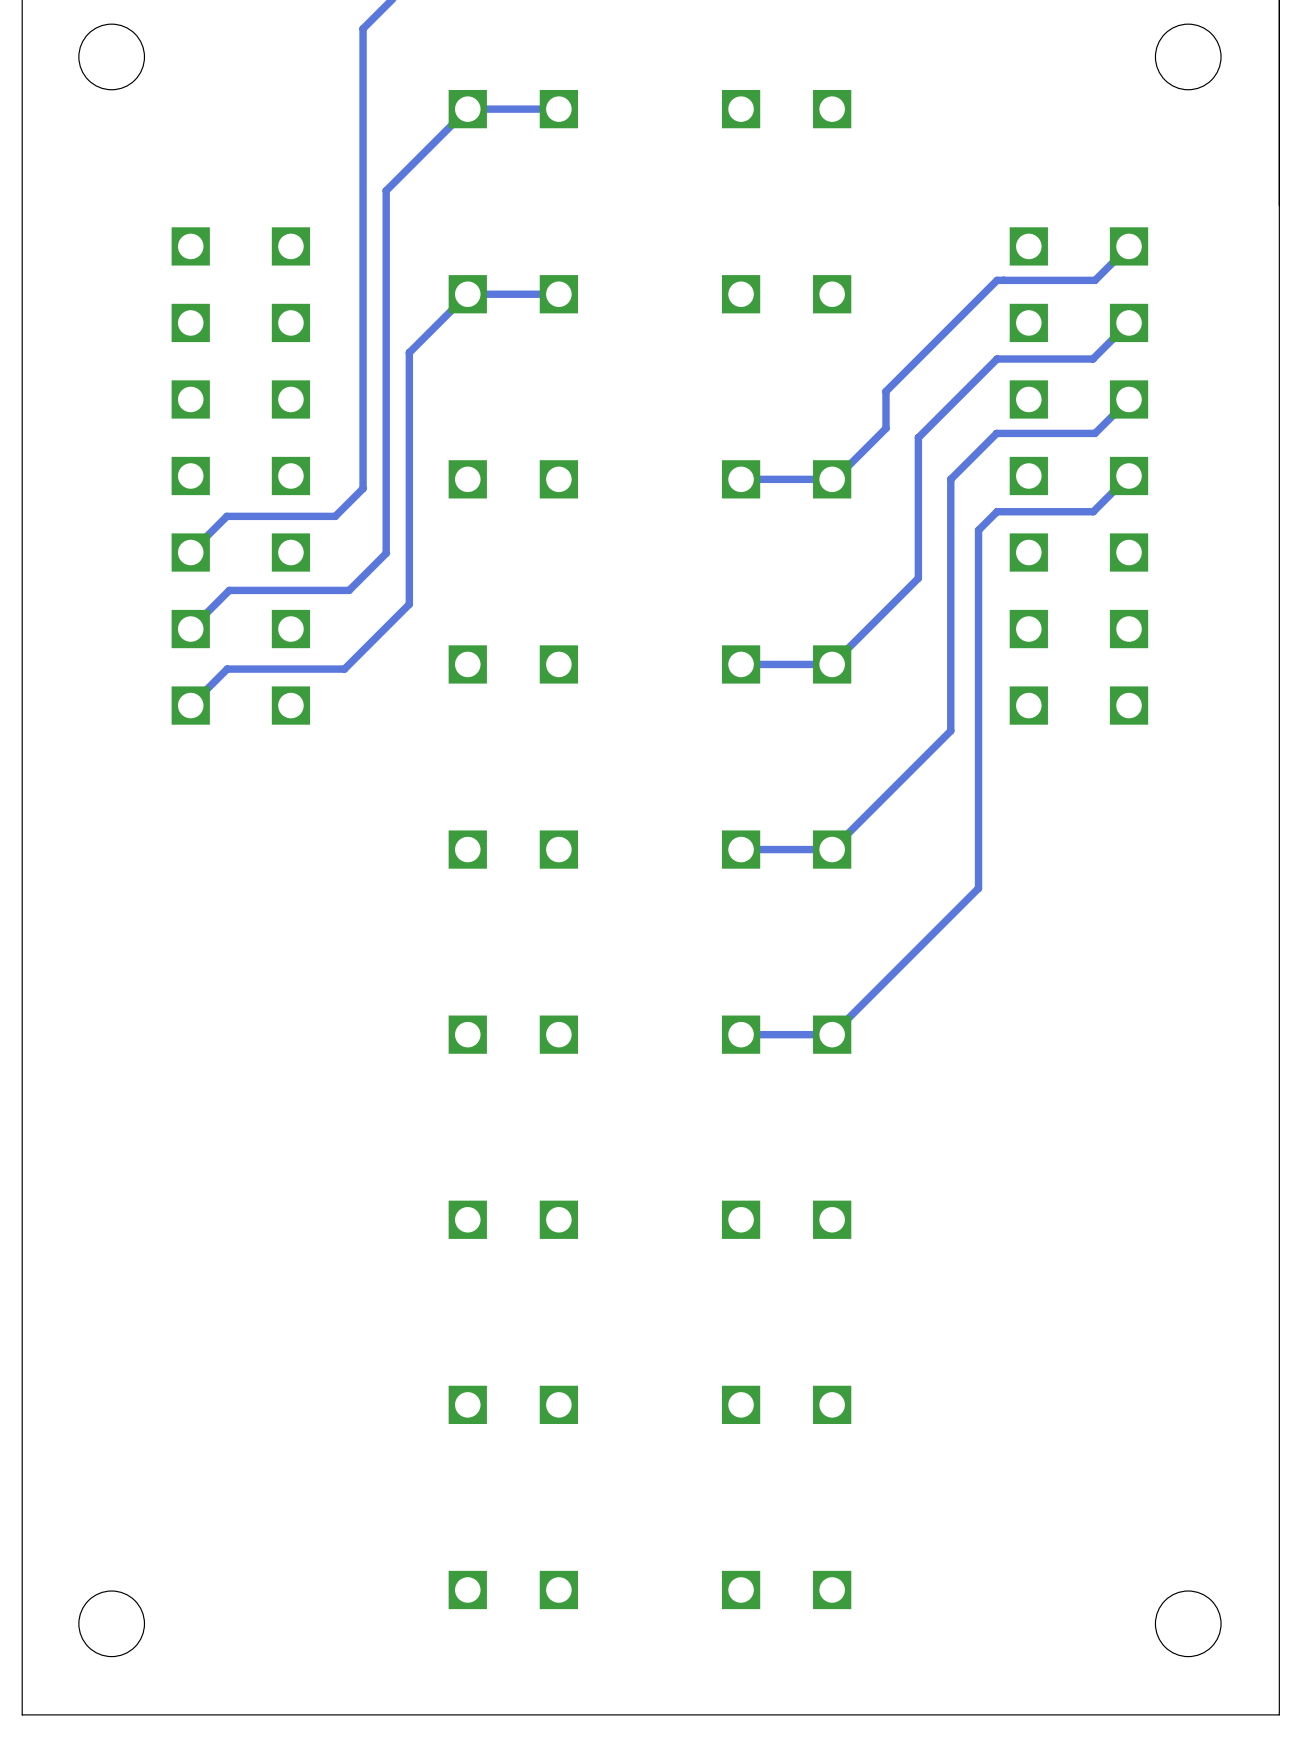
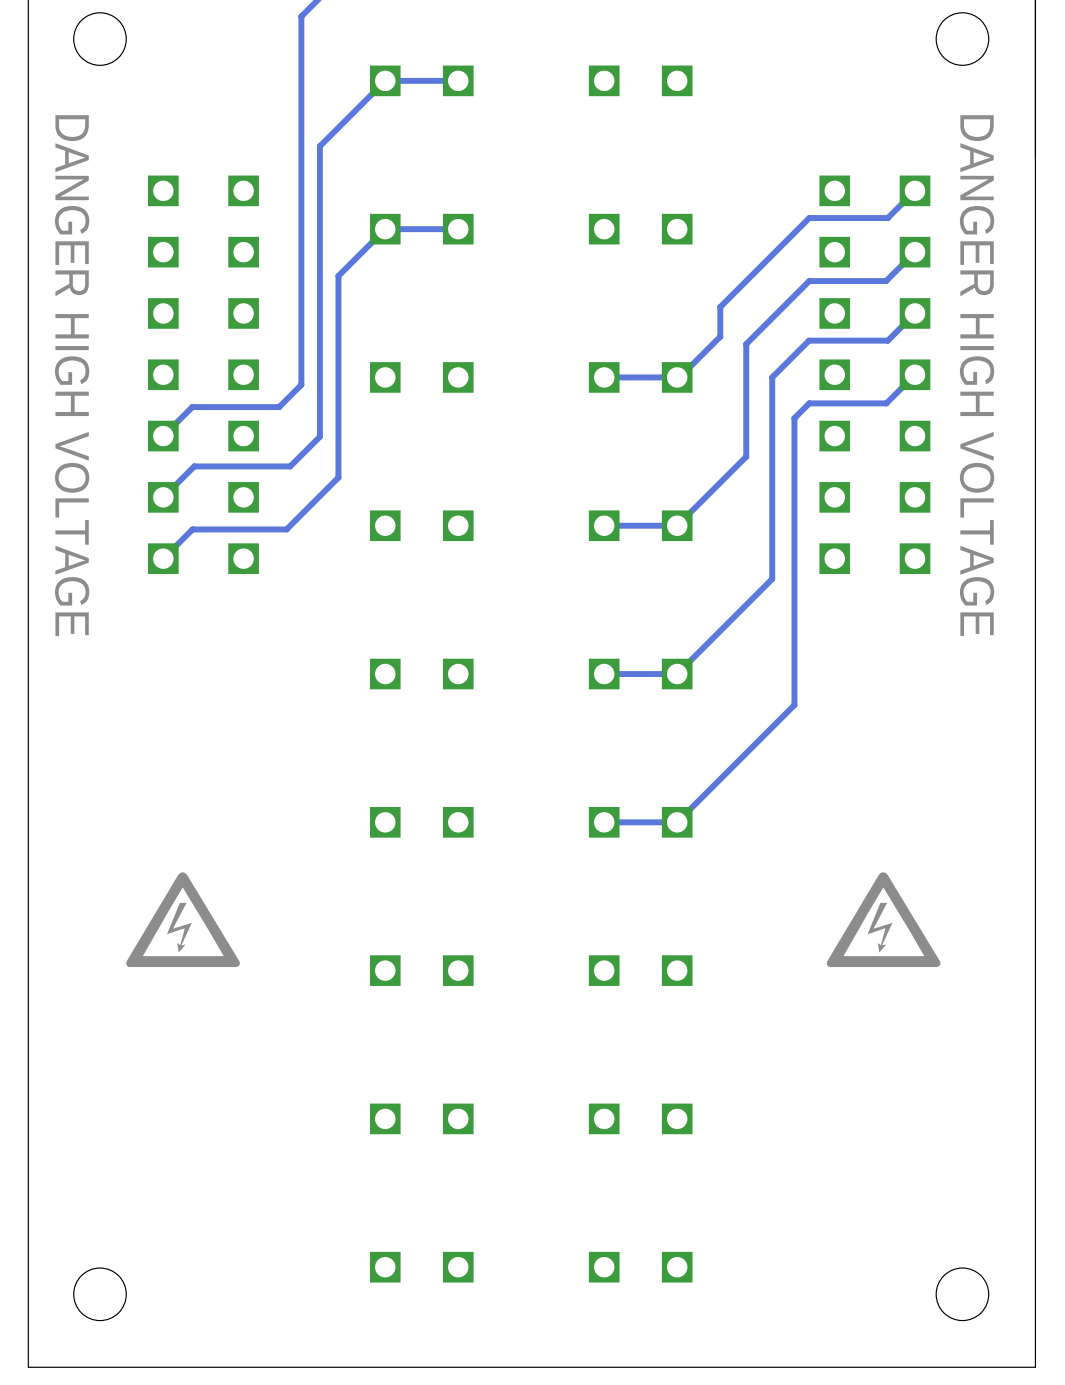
text: none -> DANGER HIGH VOLTAGE (72, 375)
text: none -> DANGER HIGH VOLTAGE (977, 375)
drawing: none -> [126, 872, 240, 968]
drawing: none -> [826, 872, 941, 968]

